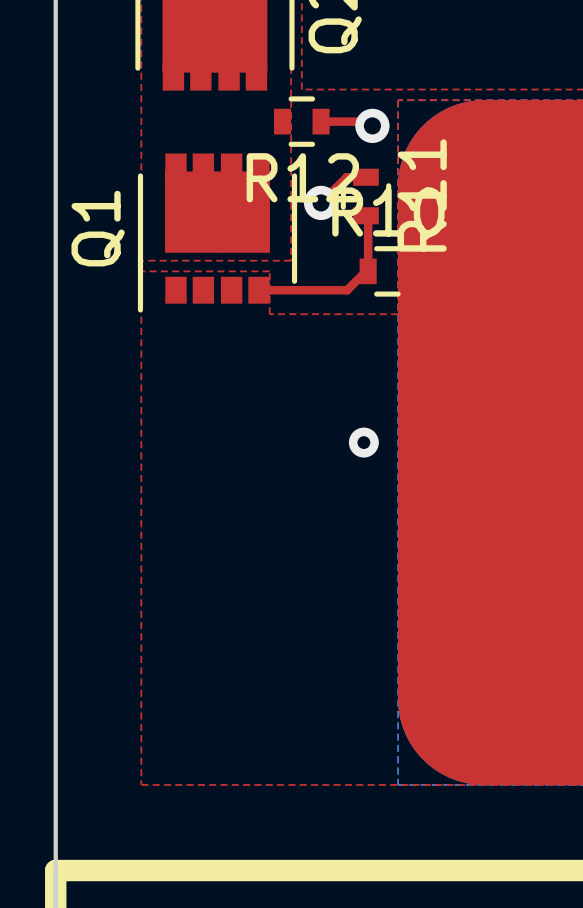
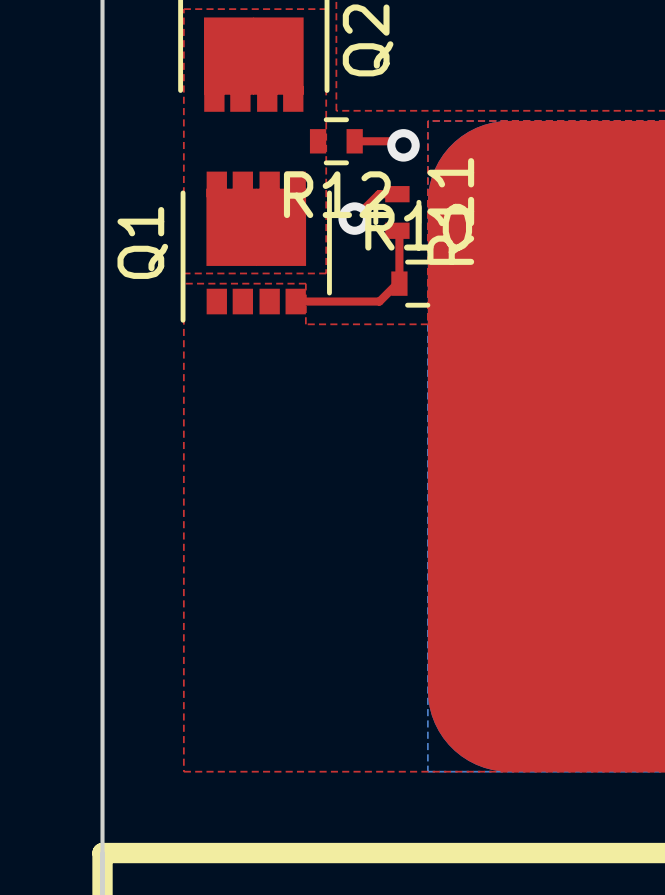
via: (363, 442) -> none

